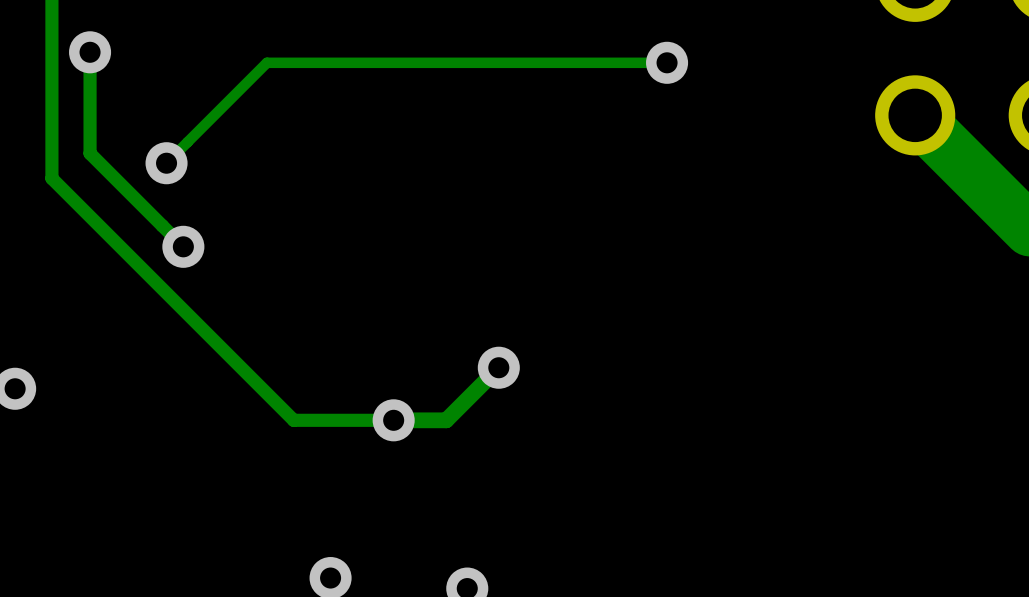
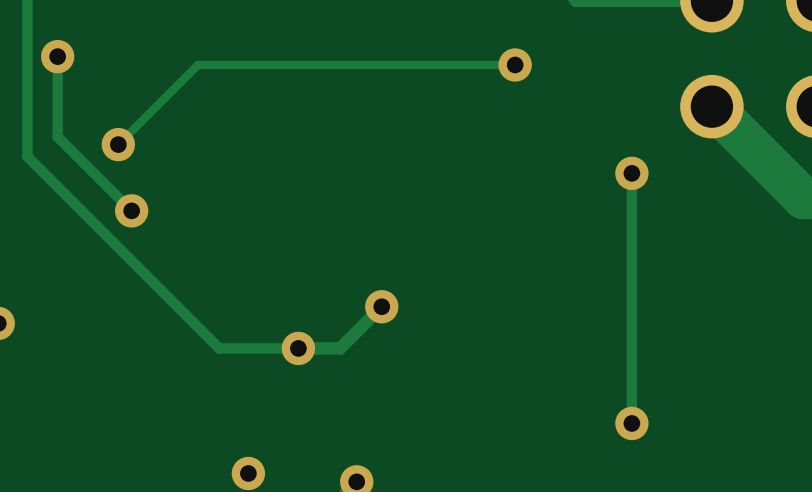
track: none -> (631, 173) (631, 423)
via: none -> (631, 173)
via: none -> (631, 423)

